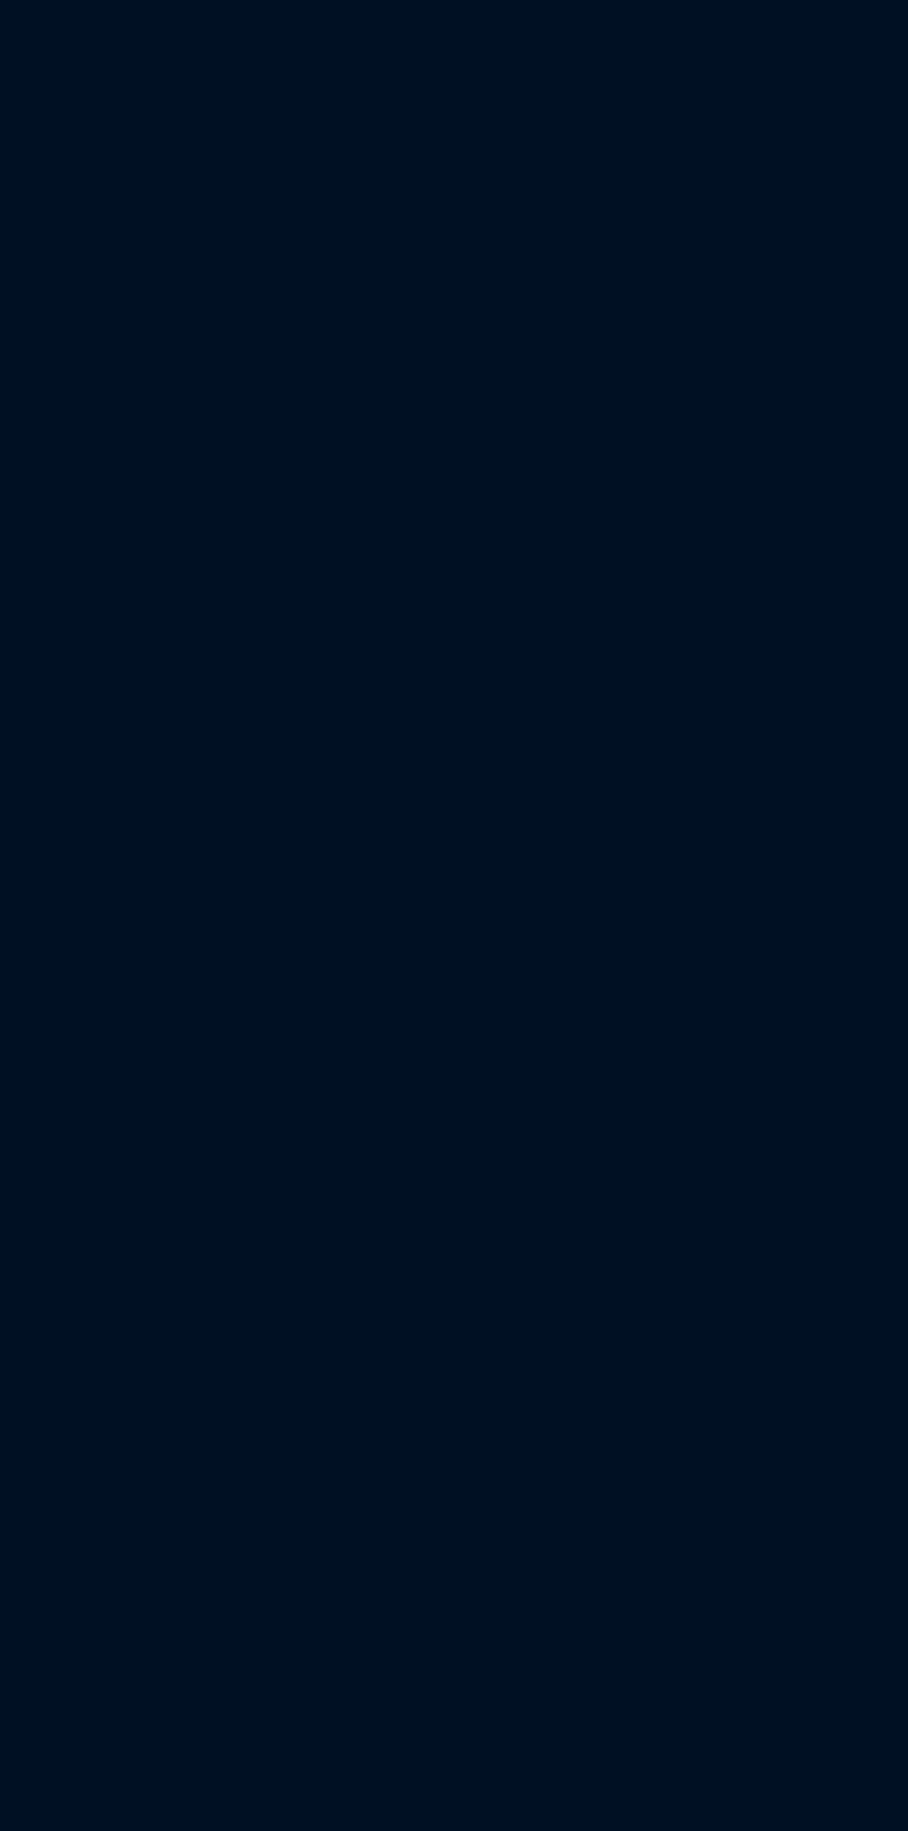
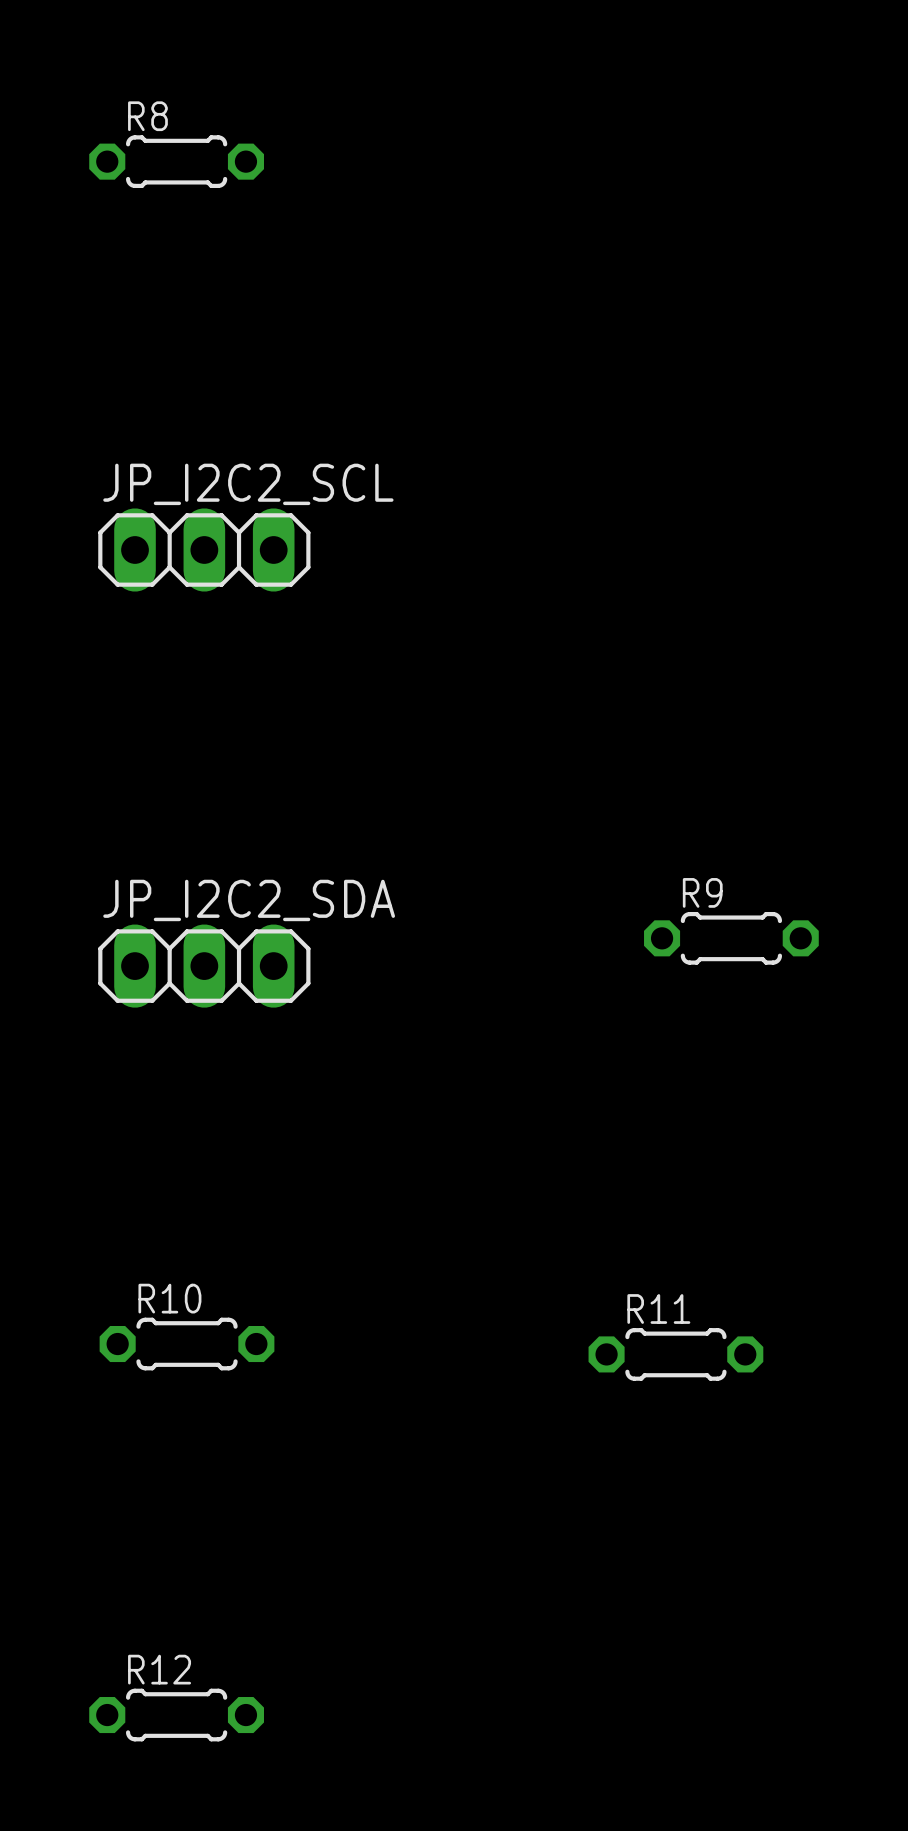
R8: none -> (176, 161)
JP_I2C2_SCL: none -> (204, 549)
R9: none -> (731, 938)
JP_I2C2_SDA: none -> (204, 966)
R10: none -> (187, 1344)
R11: none -> (675, 1354)
R12: none -> (176, 1715)

